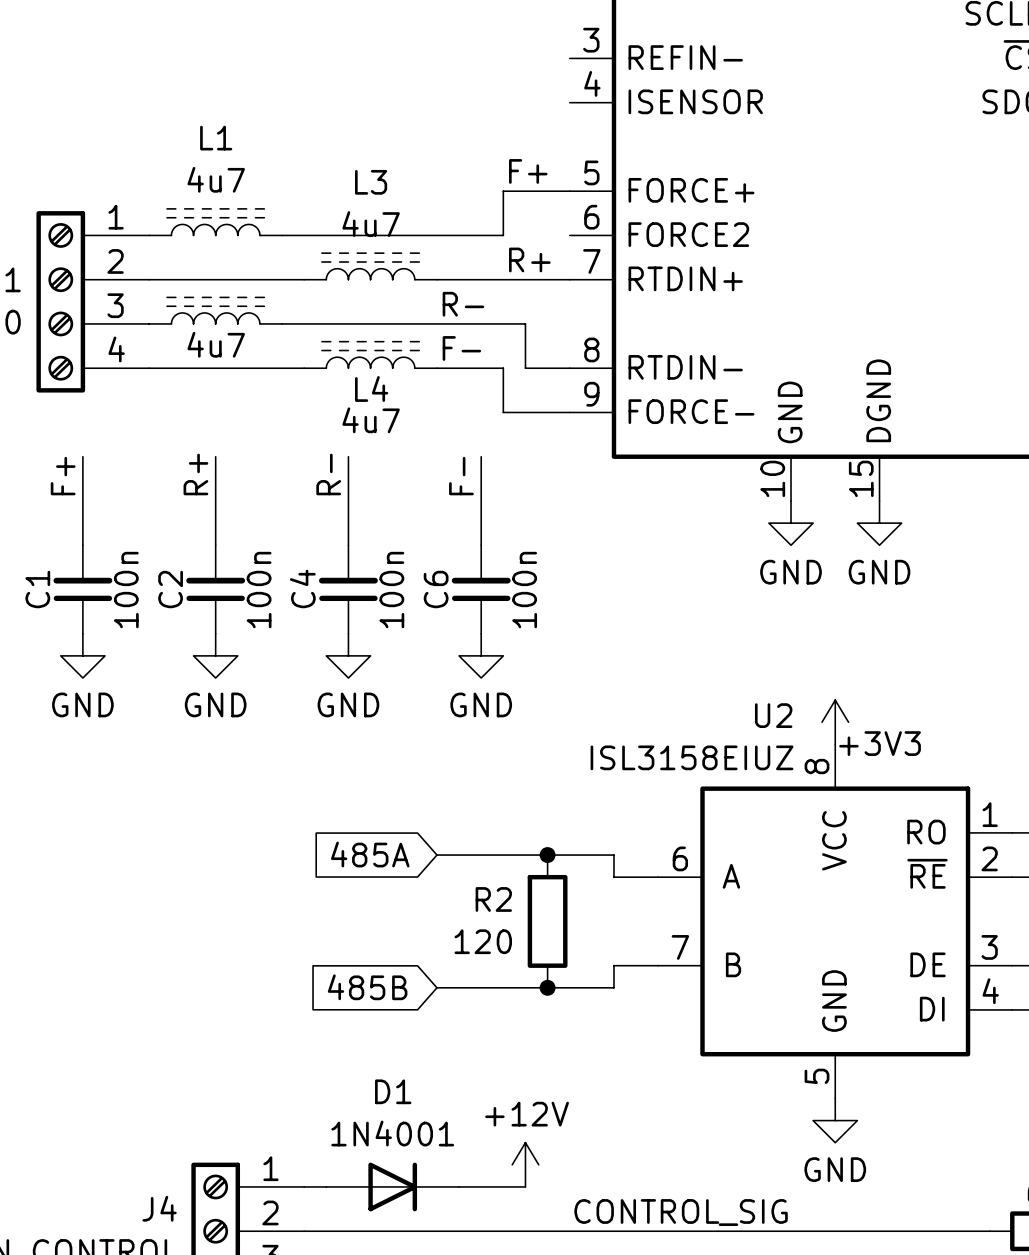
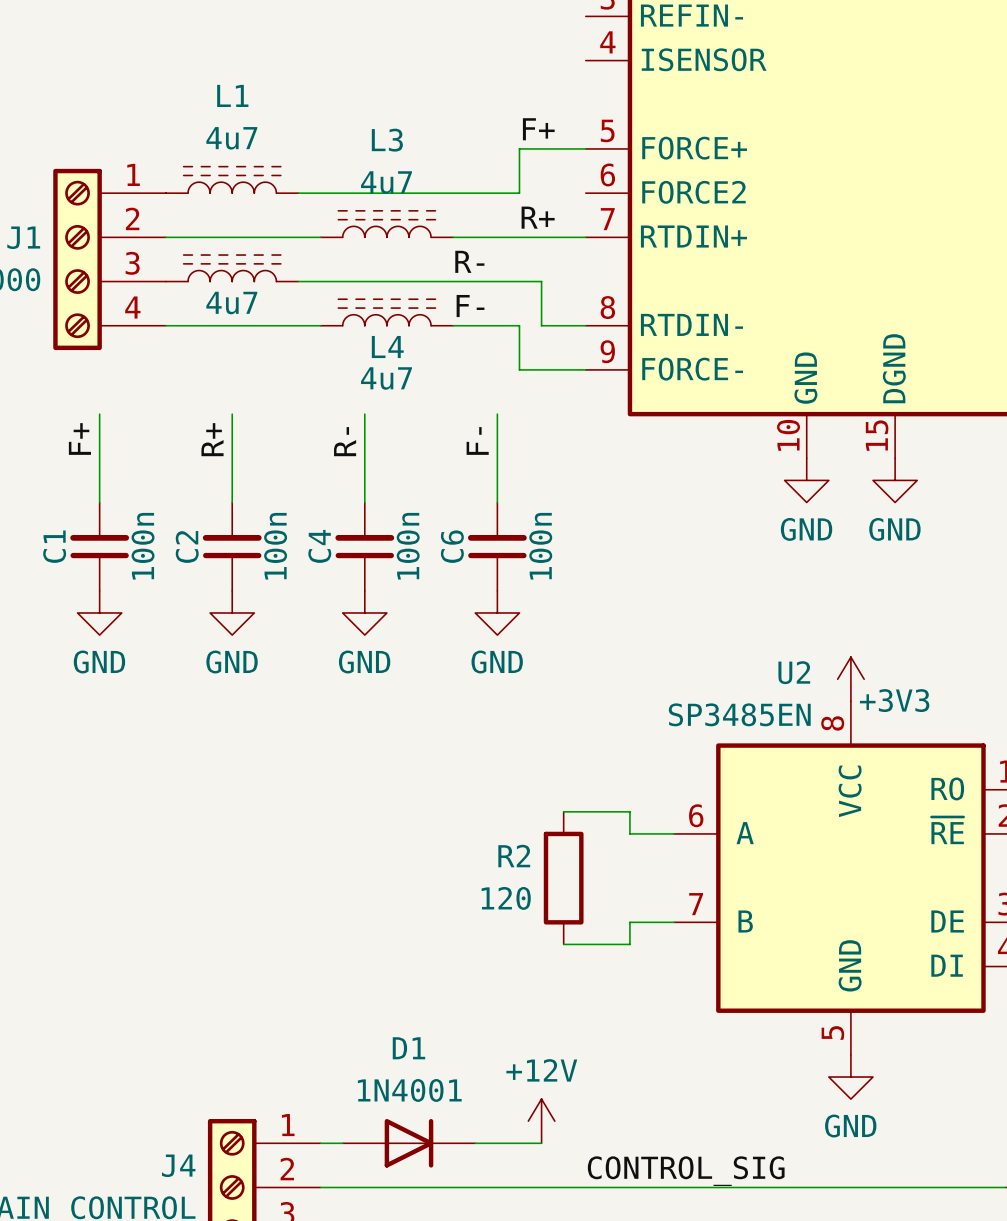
U2 value: ISL3158EIUZ (692, 757) -> SP3485EN (739, 714)
global label: 485A (370, 854) -> none
wire: (436, 855) (547, 855) -> none
junction: (547, 855) -> none
global label: 485B (367, 987) -> none
wire: (436, 987) (547, 987) -> none
junction: (547, 987) -> none

